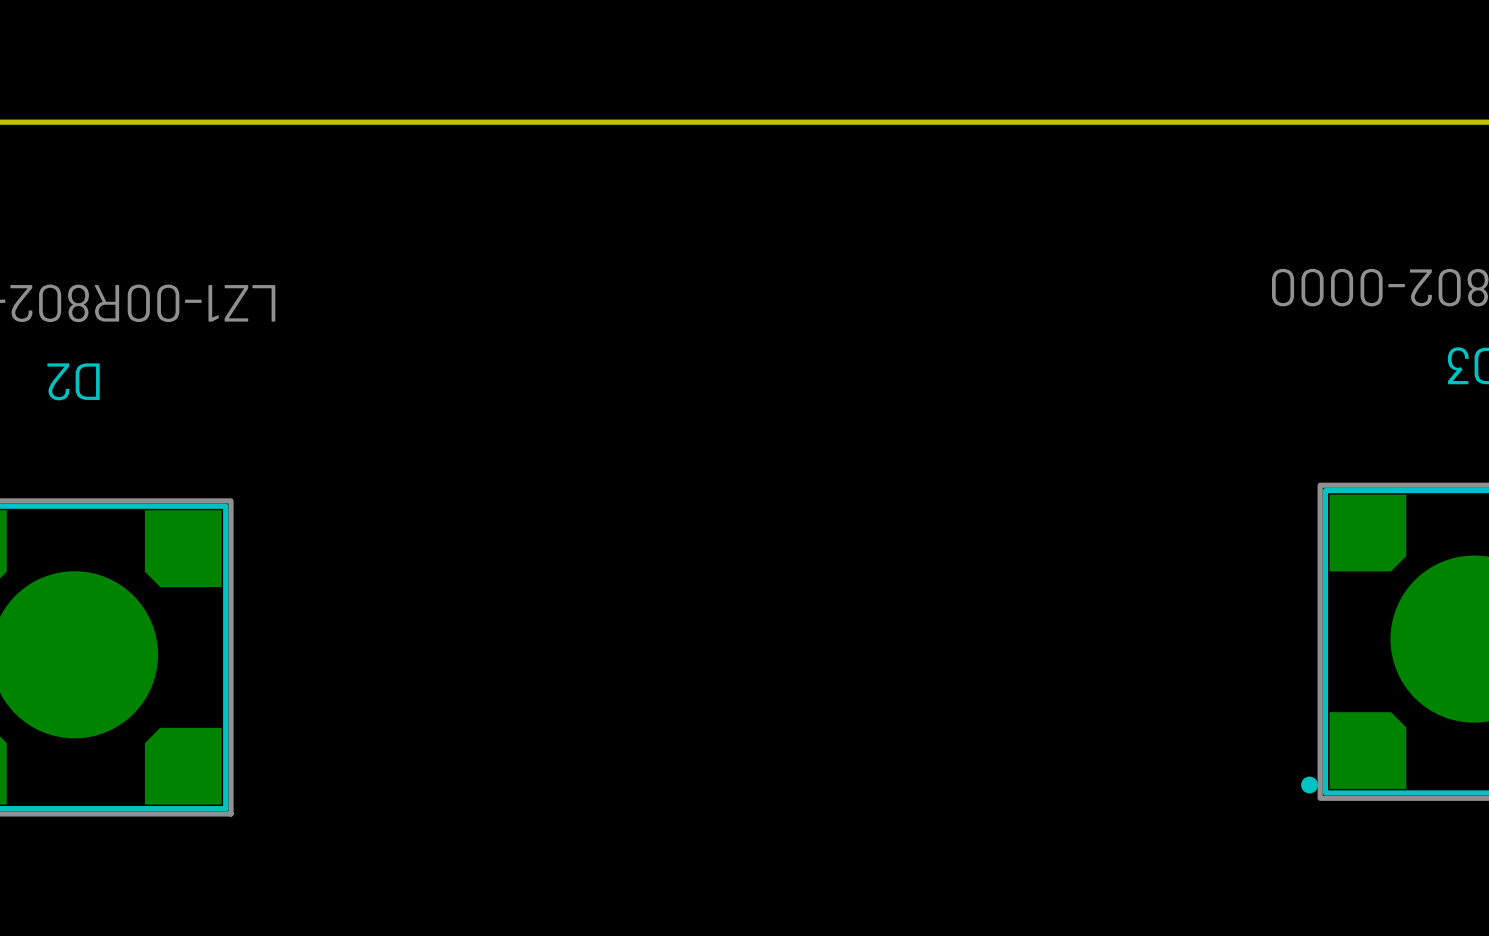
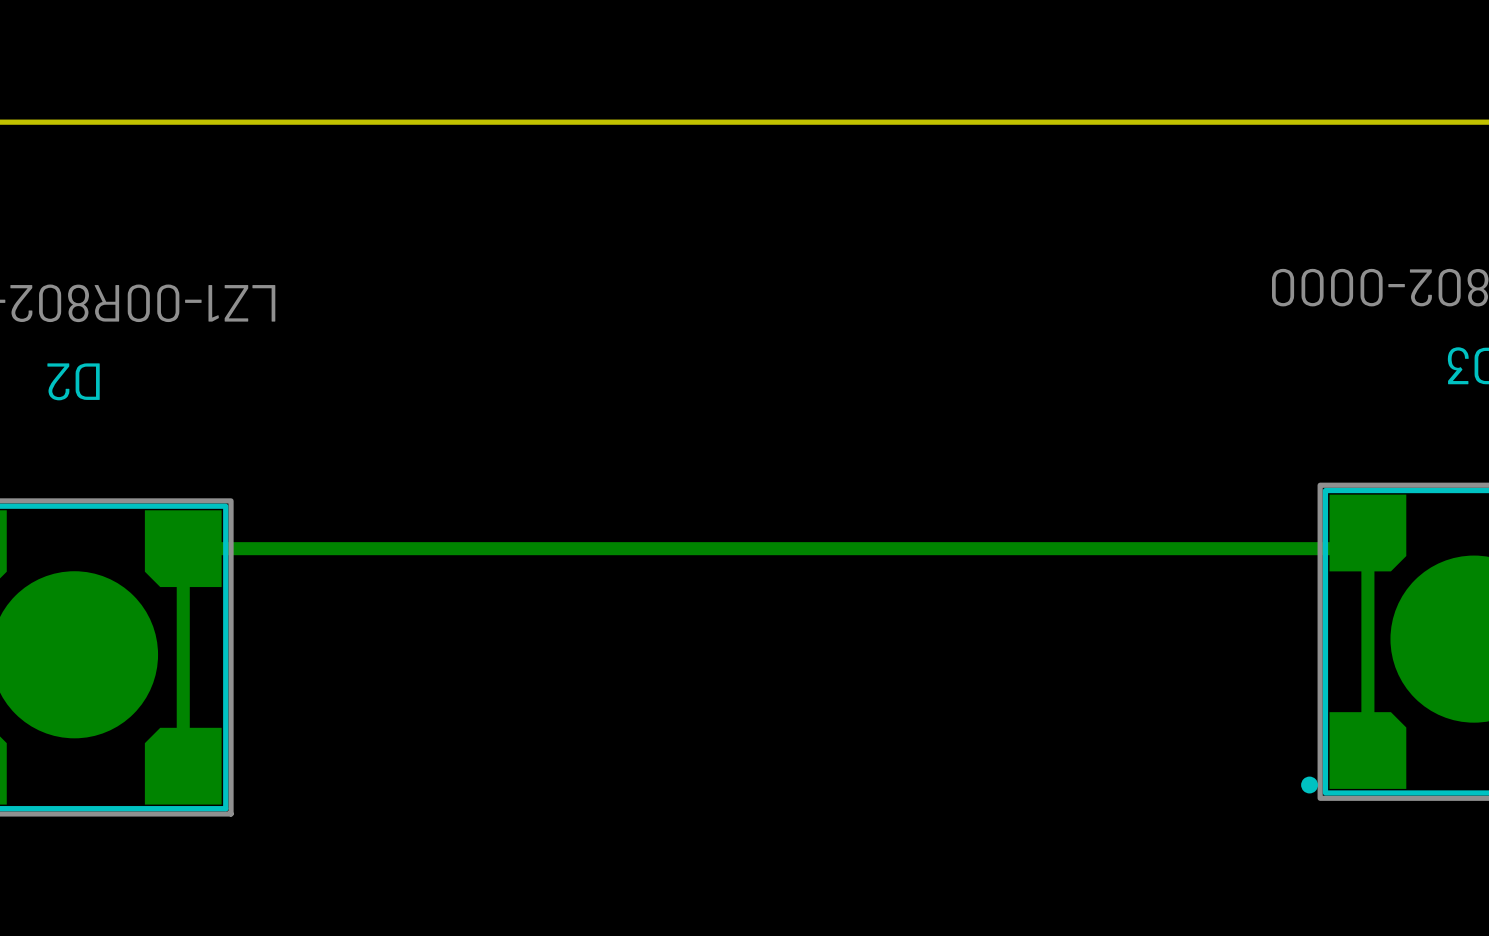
track: none -> (1367, 750) (1367, 533) (1352, 548) (183, 548) (183, 766)

